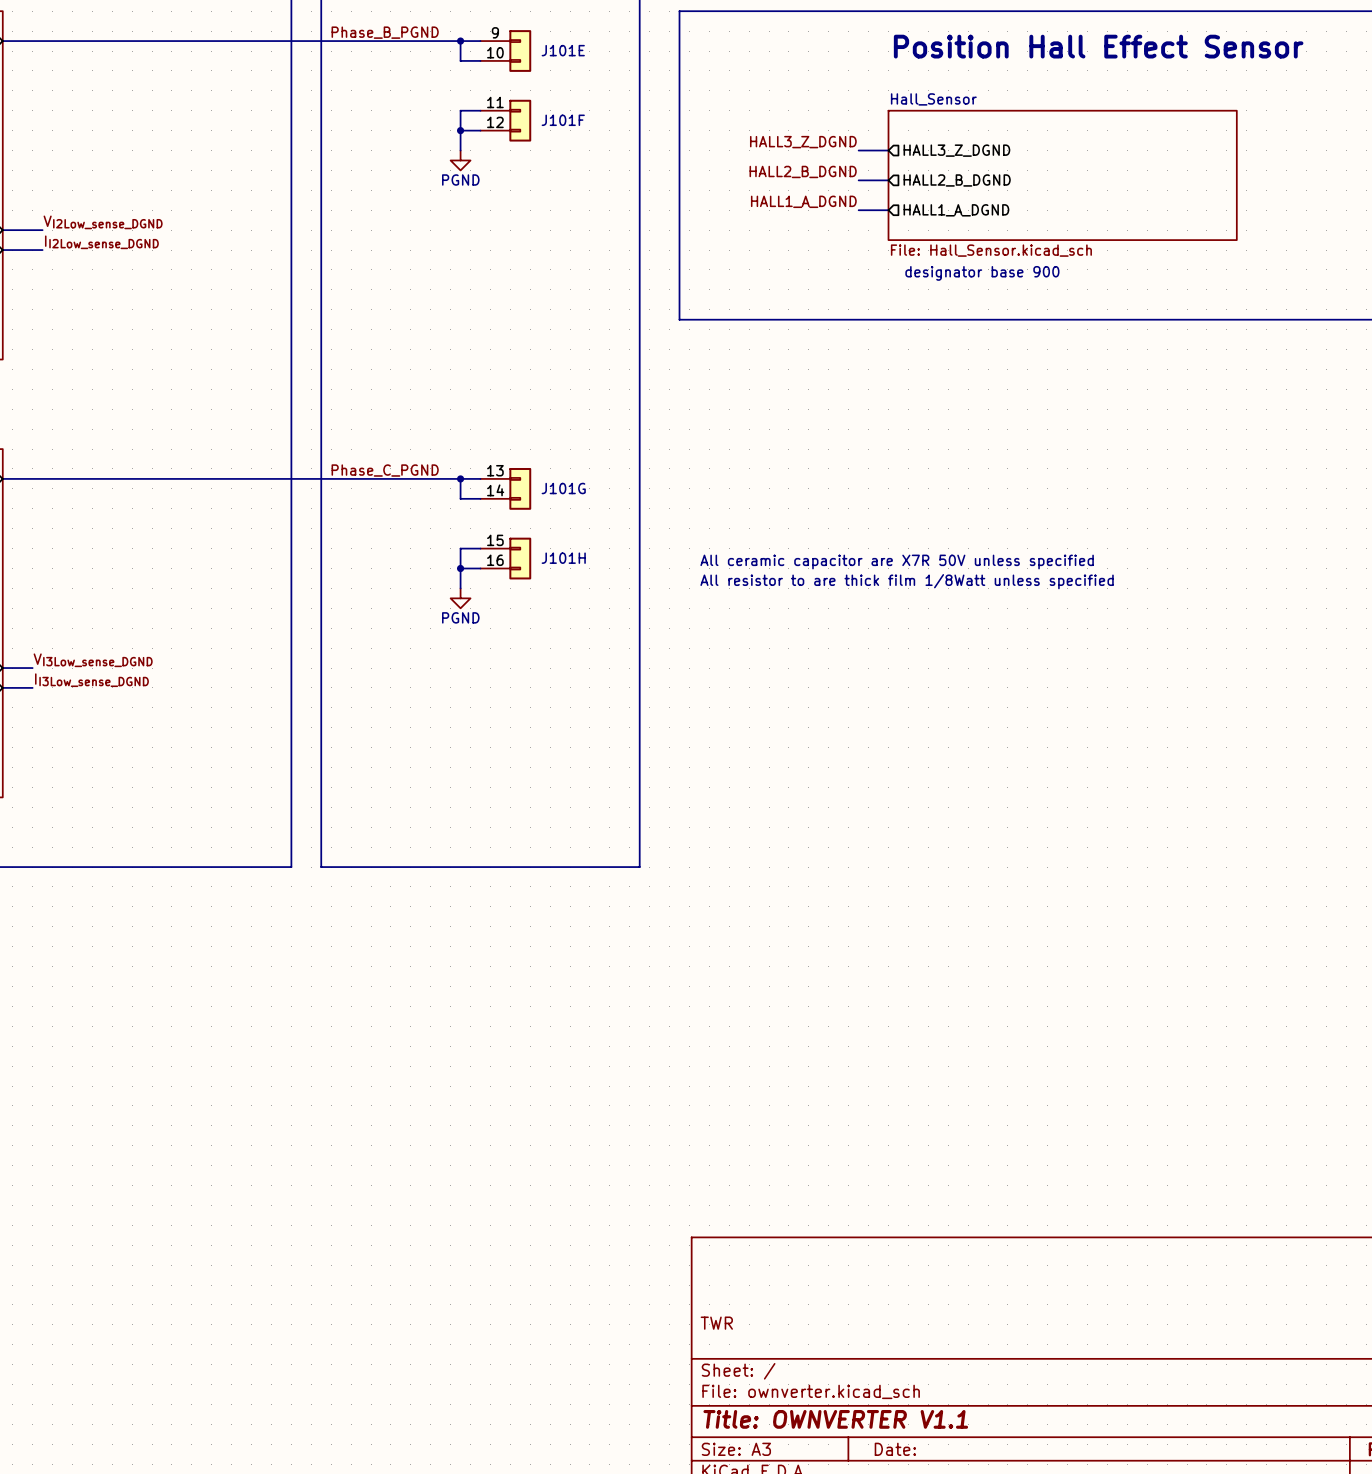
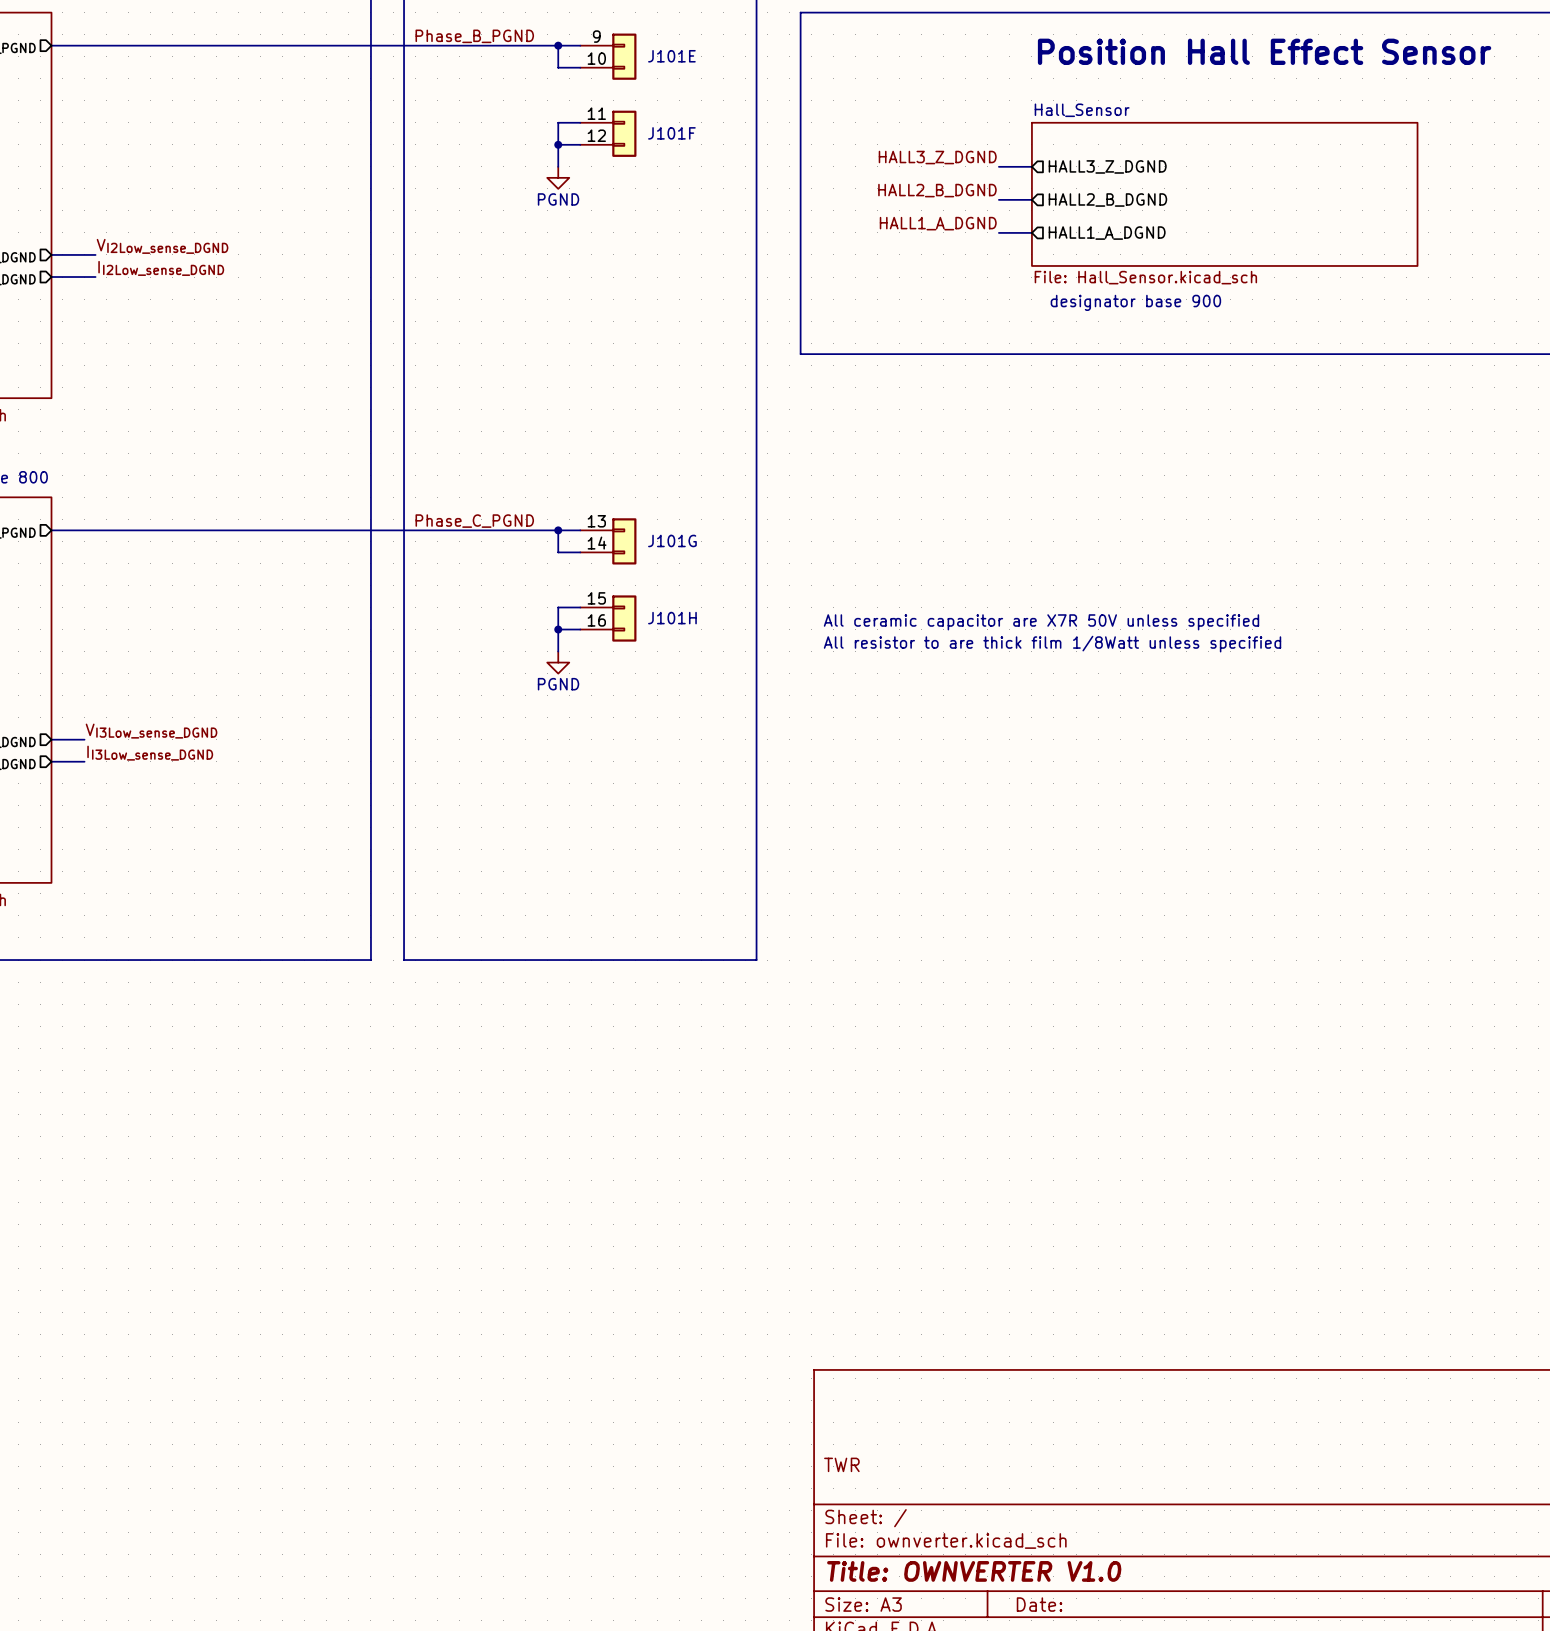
title block: Title: OWNVERTER V1.1 (835, 1419) -> Title: OWNVERTER V1.0 (974, 1571)

